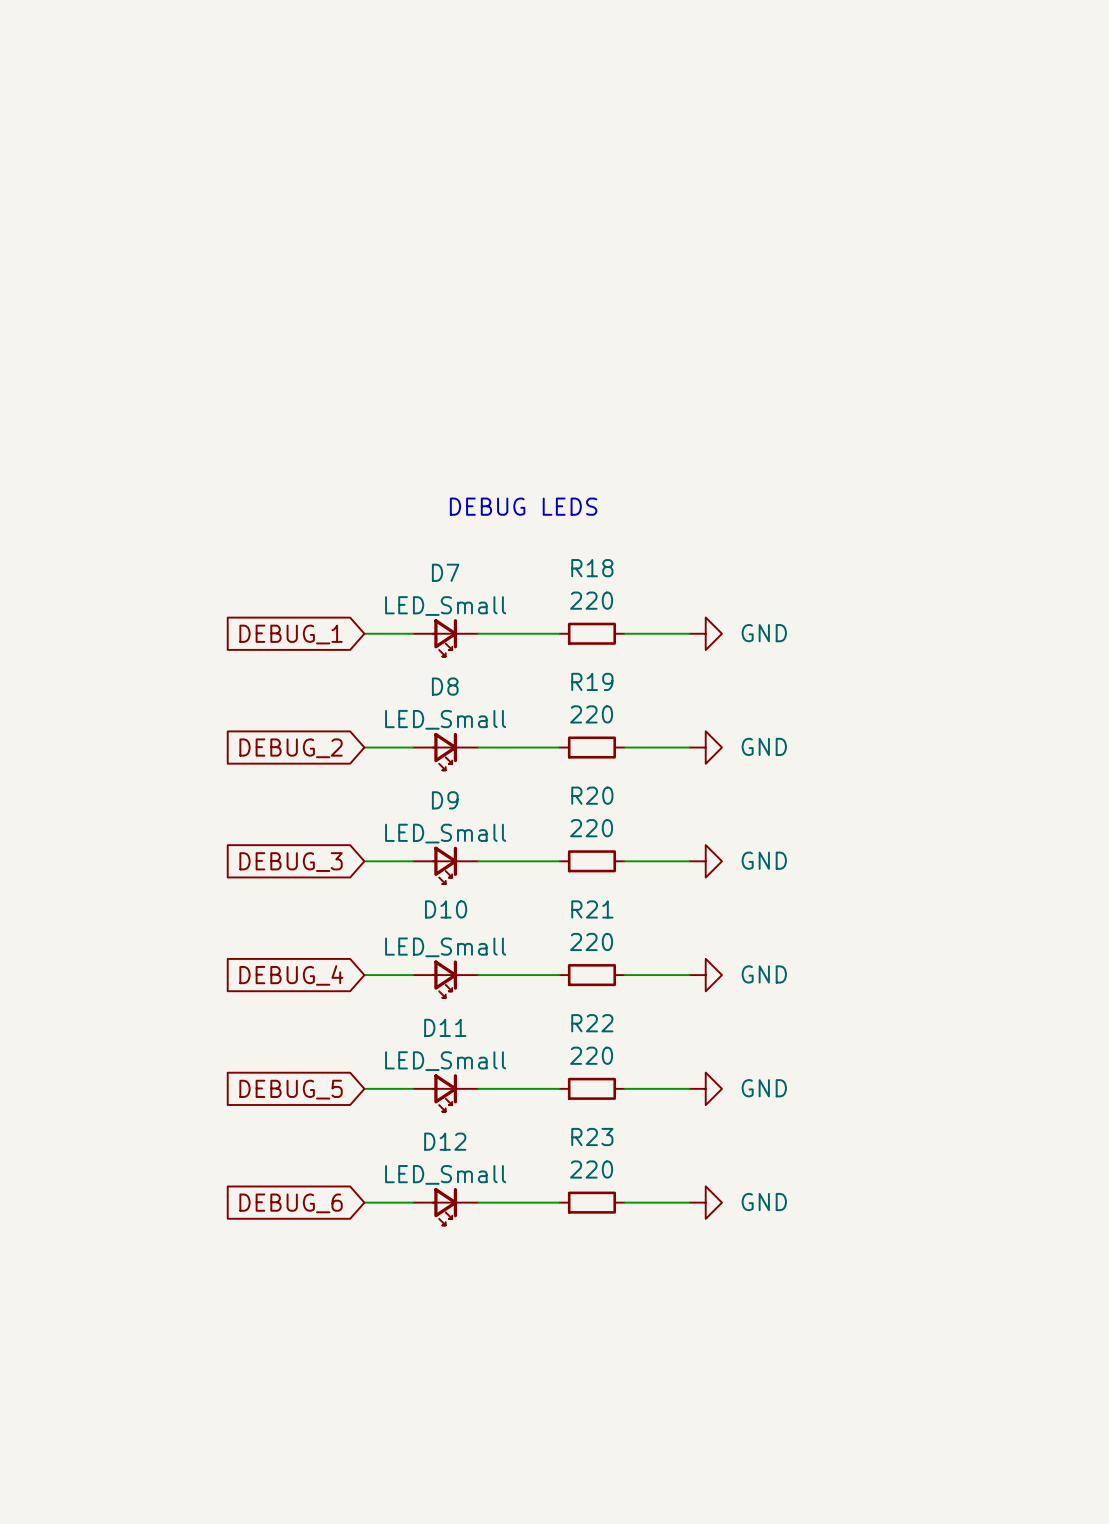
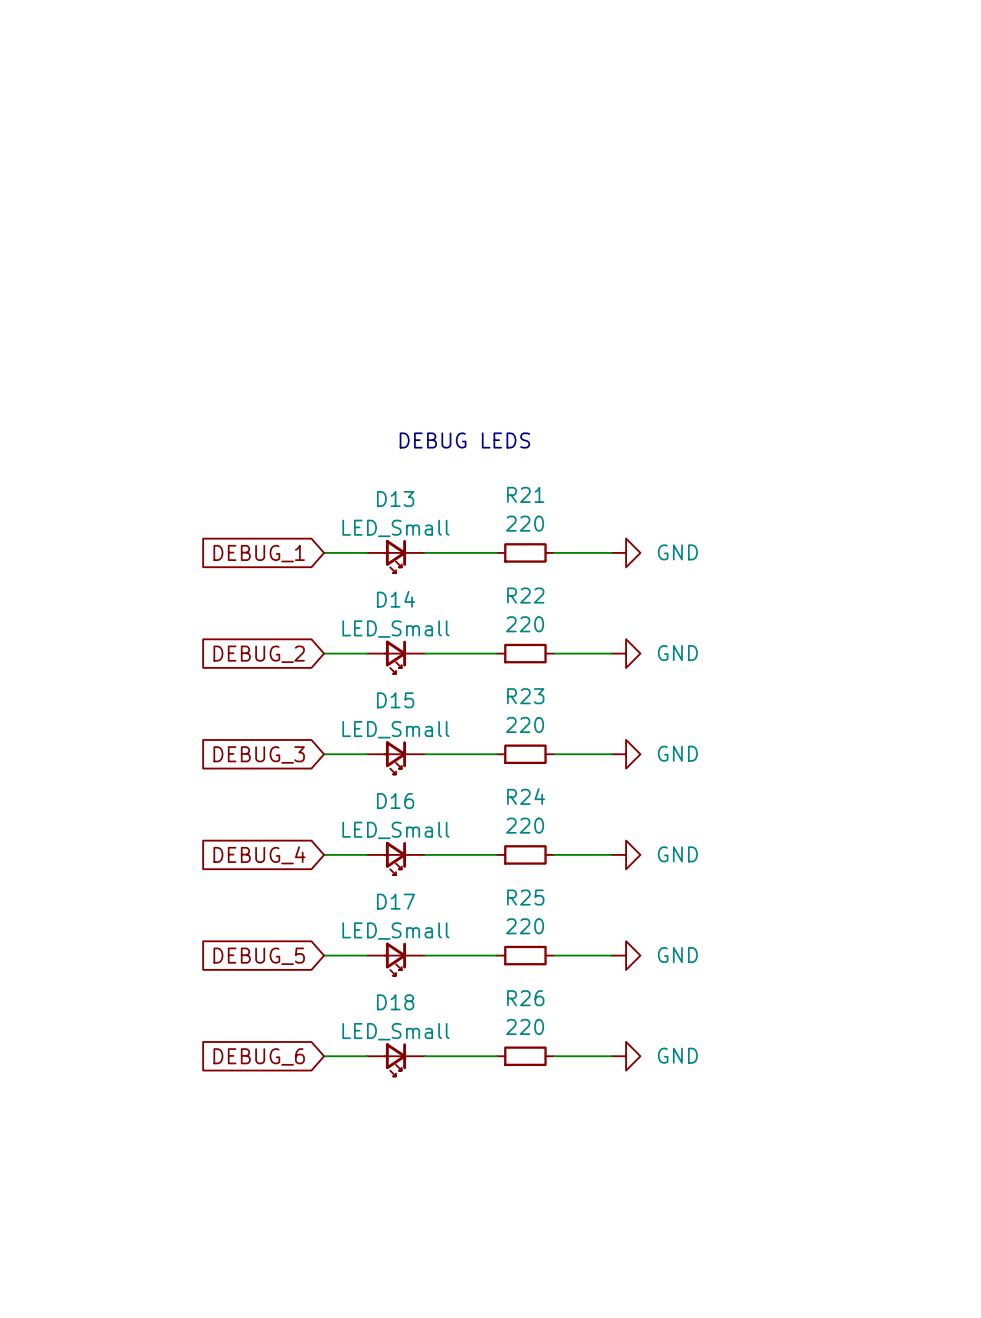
R18 name: R18 (592, 568) -> R21 (525, 494)
D7 name: D7 (445, 572) -> D13 (395, 498)
R19 name: R19 (592, 681) -> R22 (525, 595)
D8 name: D8 (445, 686) -> D14 (395, 599)
R20 name: R20 (592, 795) -> R23 (525, 696)
D9 name: D9 (445, 800) -> D15 (395, 700)
D10 name: D10 (446, 909) -> D16 (395, 800)
R21 name: R21 (592, 909) -> R24 (526, 796)
R22 name: R22 (592, 1023) -> R25 (525, 897)
D11 name: D11 (445, 1027) -> D17 (395, 901)
R23 name: R23 (592, 1137) -> R26 (525, 998)
D12 name: D12 (445, 1141) -> D18 (395, 1002)

